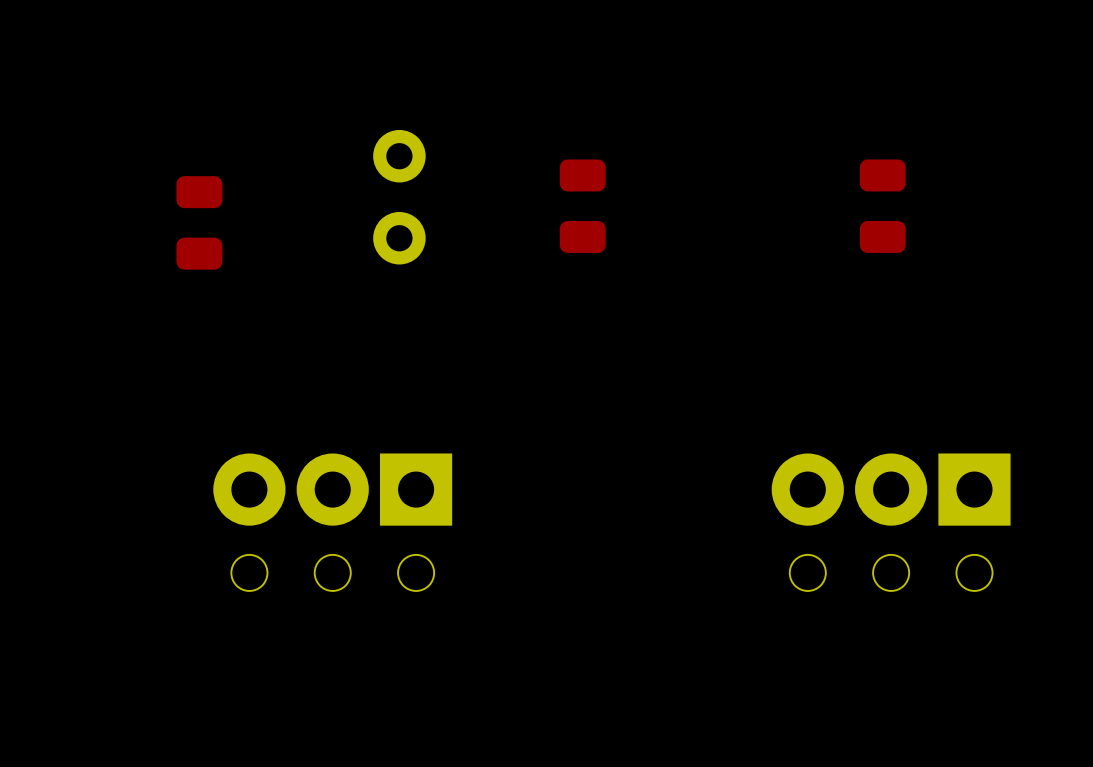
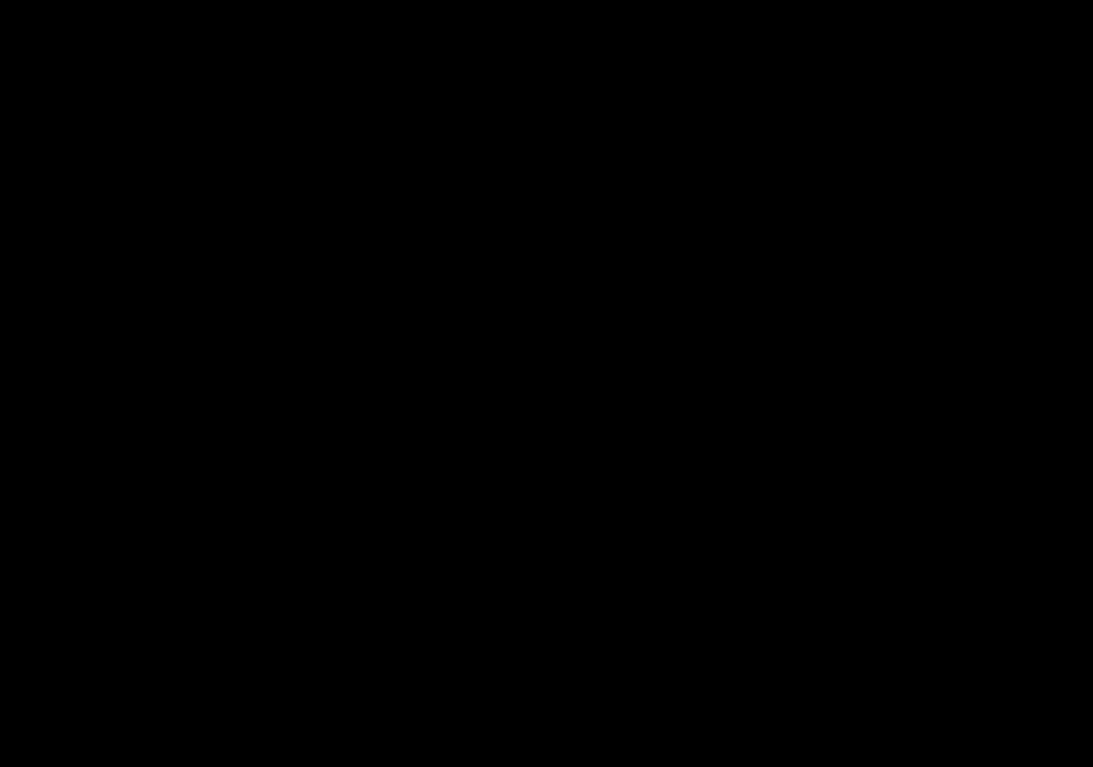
part: (399, 197) -> none
part: (582, 206) -> none
part: (882, 206) -> none
part: (199, 222) -> none
part: (332, 522) -> none
part: (891, 522) -> none

